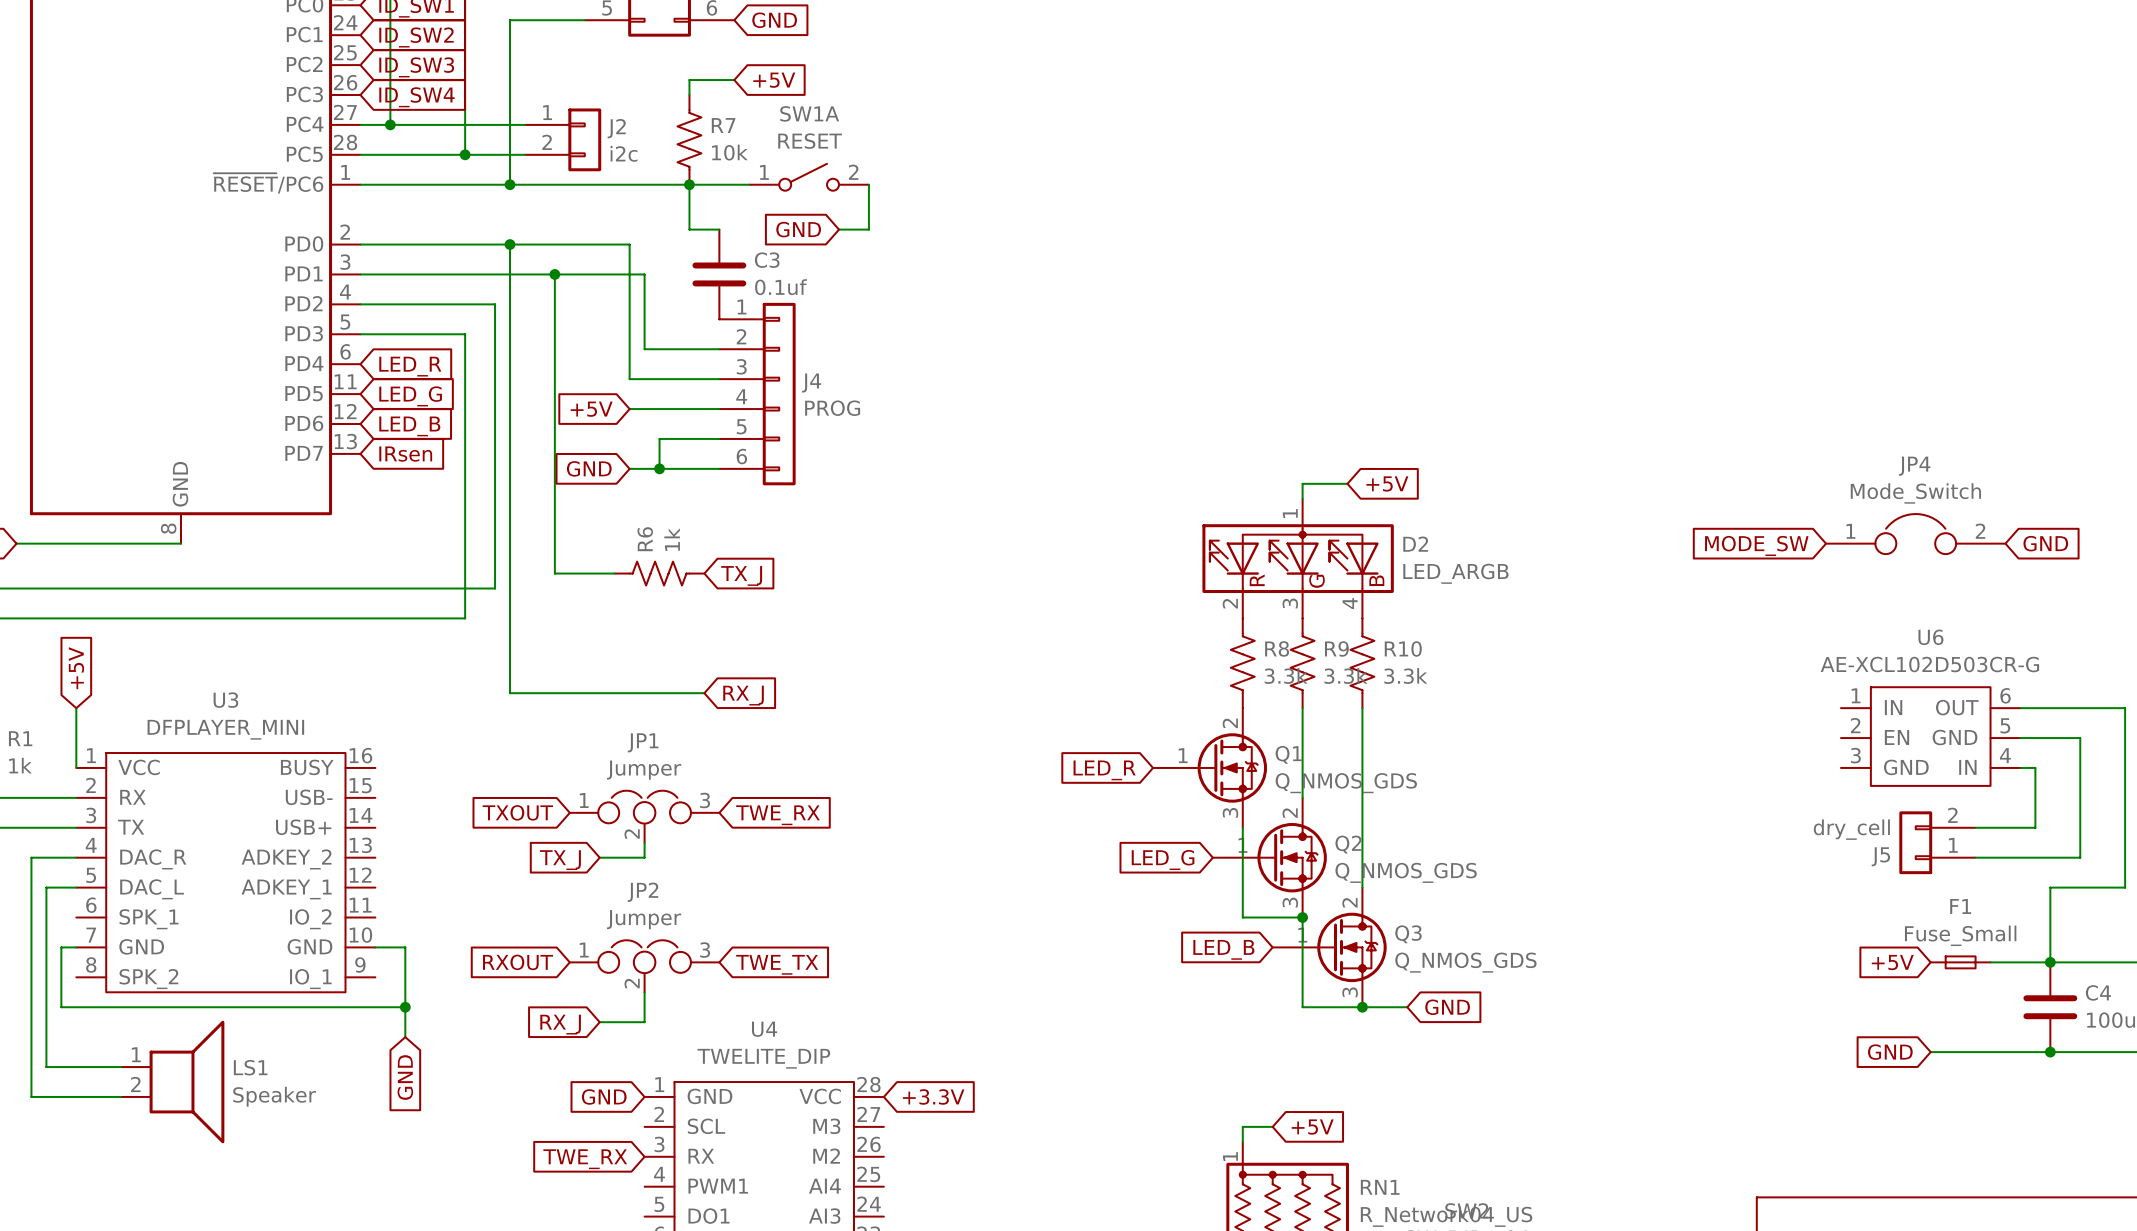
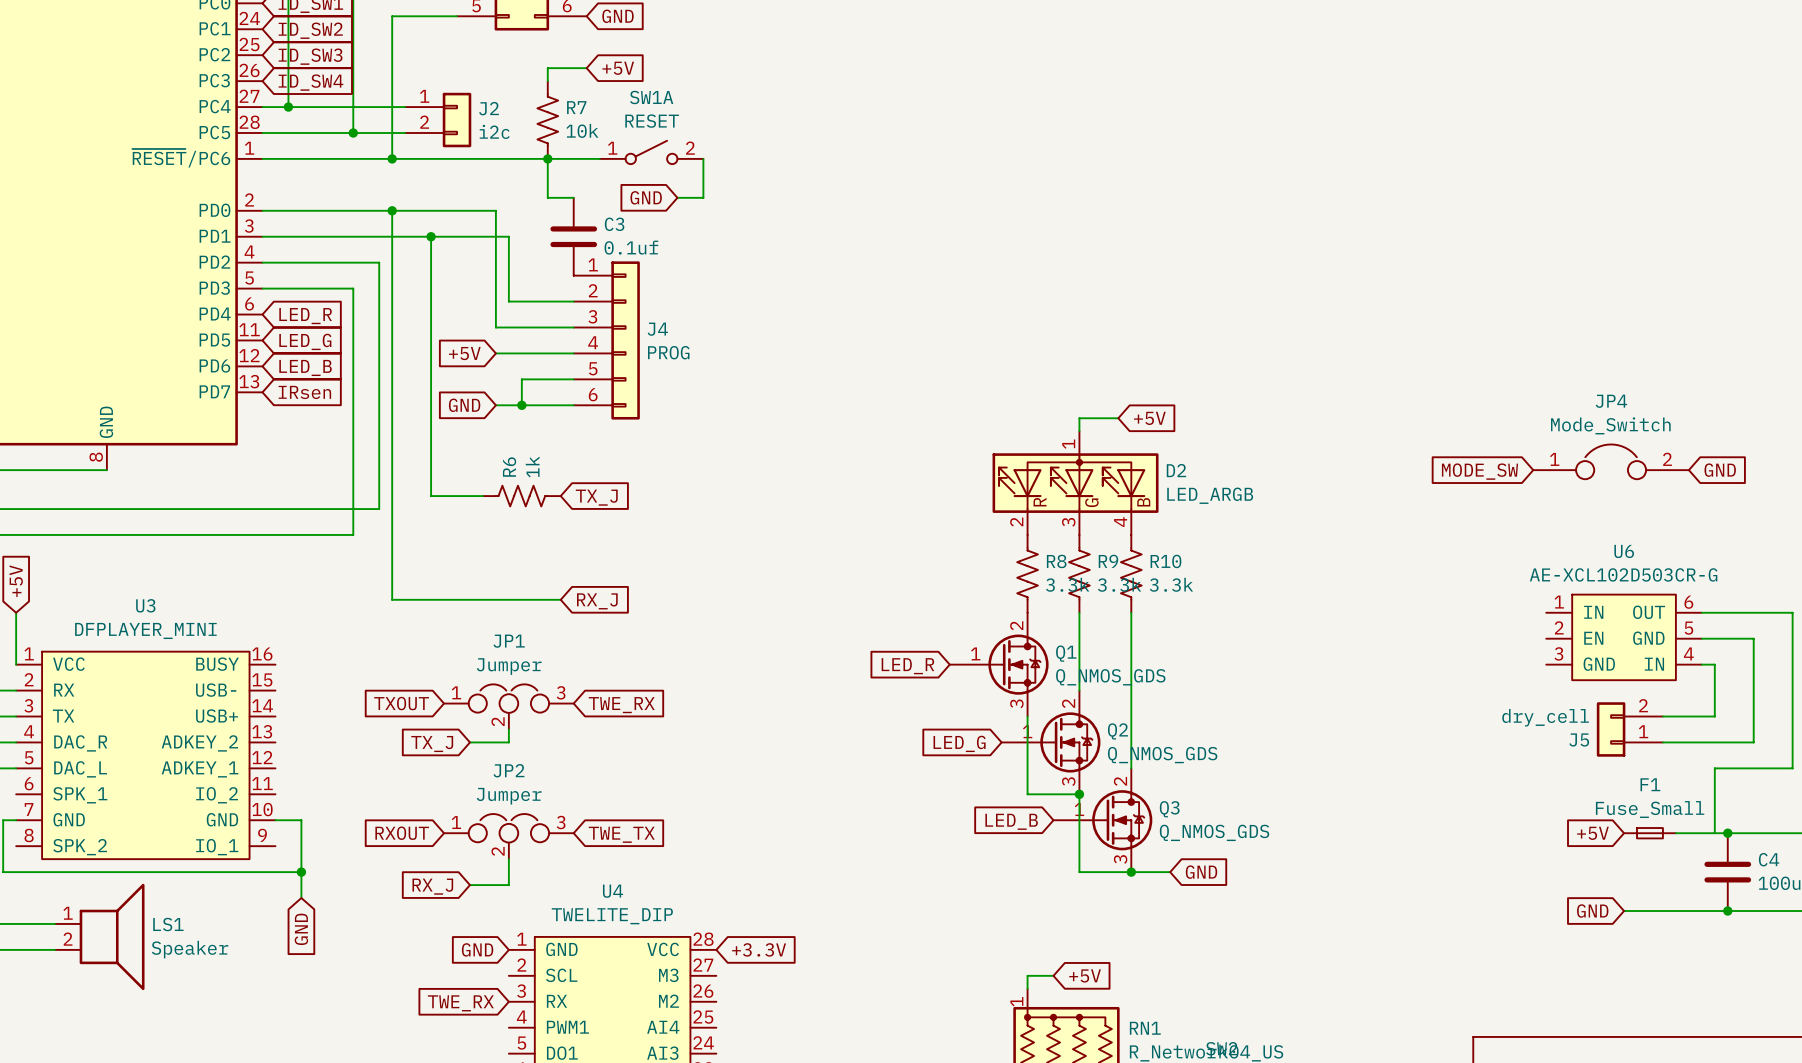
wire: (2050, 887) (2050, 962) -> (1727, 768) (1714, 768) (1714, 833)

